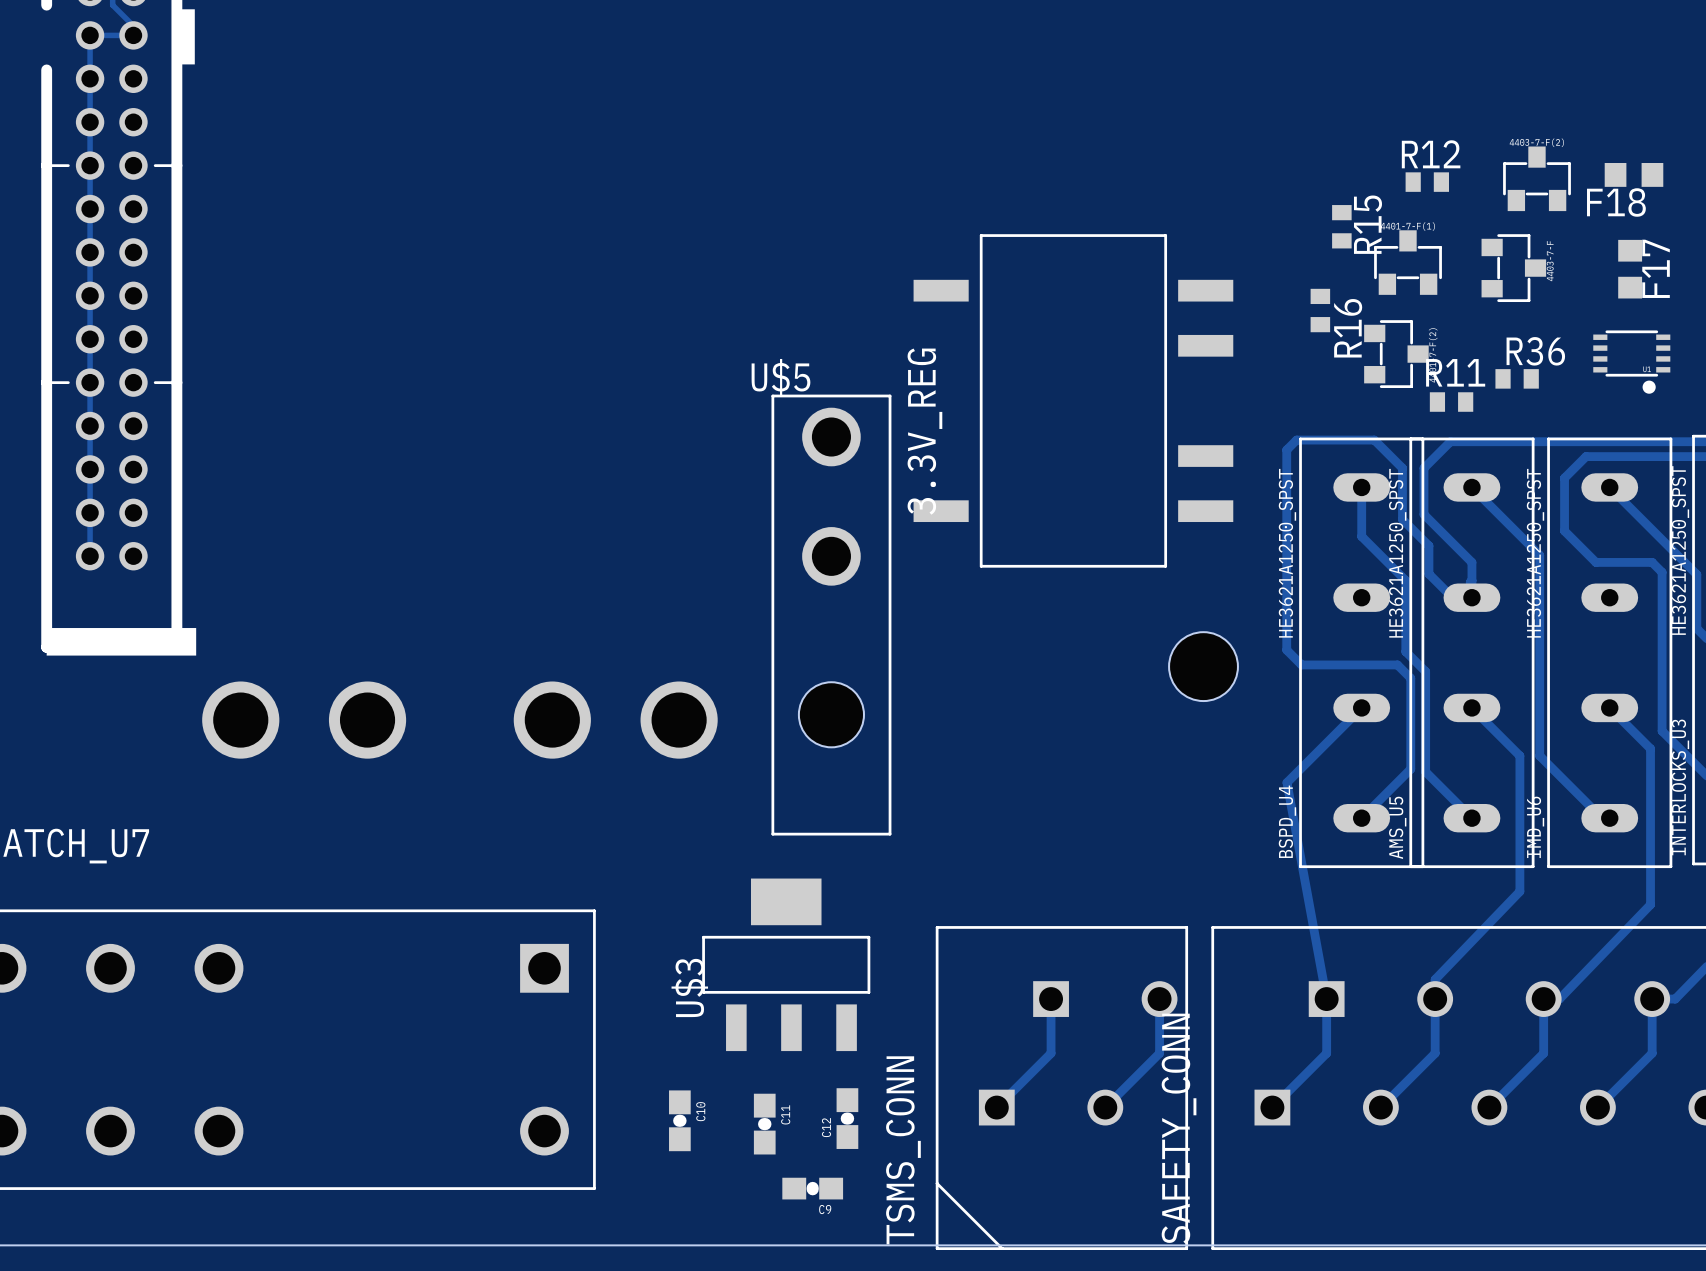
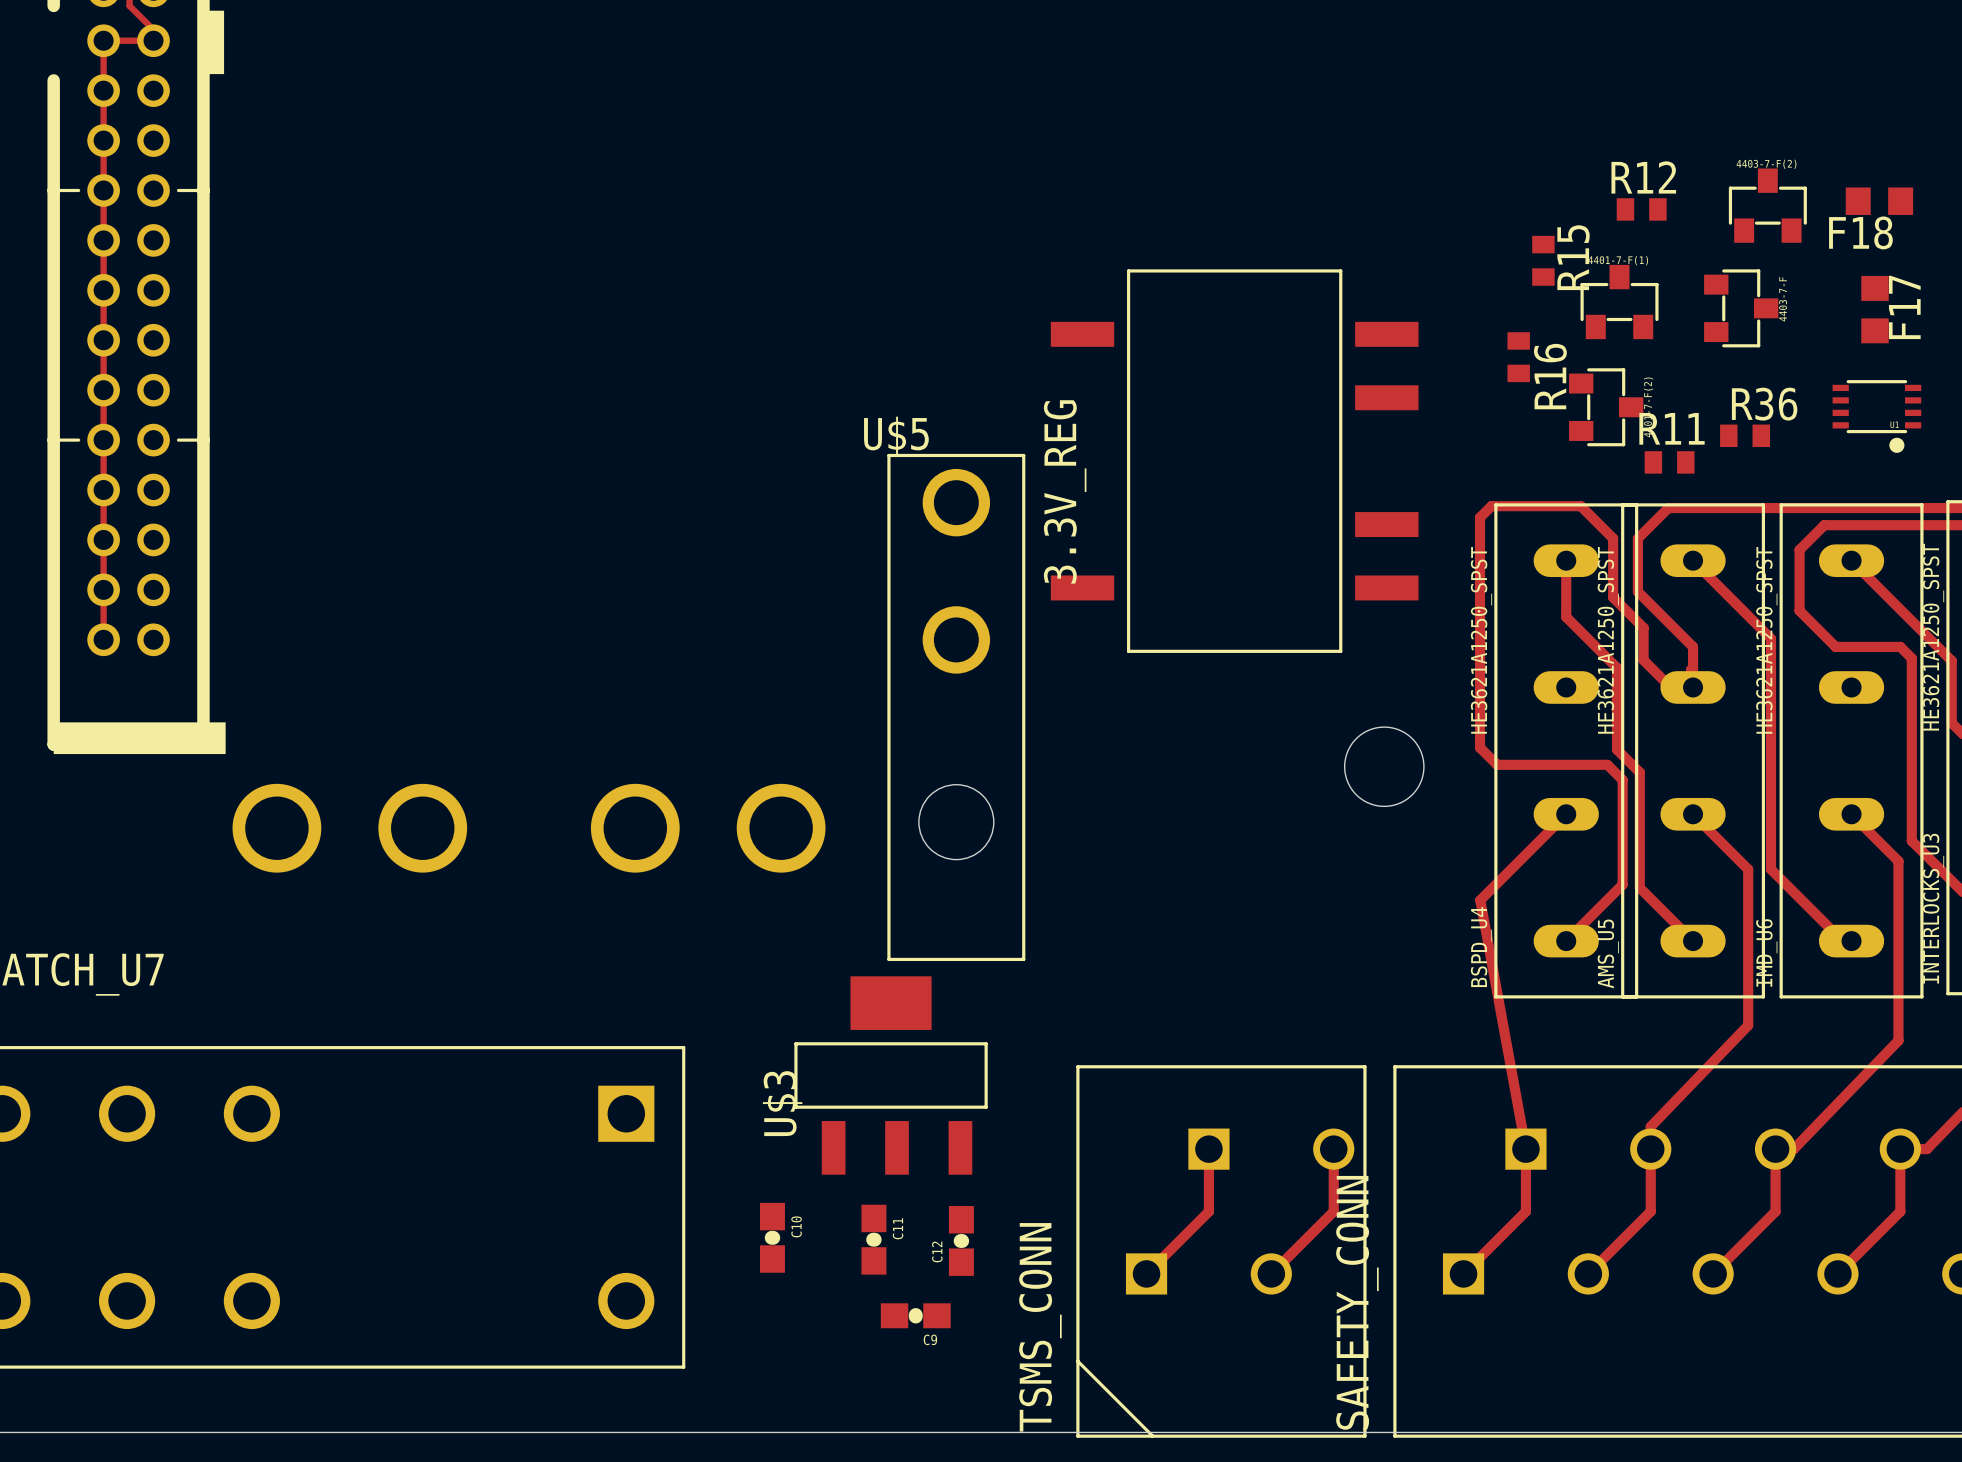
U$3 position: (786, 964) -> (891, 1075)
C12 position: (847, 1118) -> (961, 1240)
C10 position: (679, 1120) -> (772, 1237)
C11 position: (764, 1124) -> (873, 1239)
C9 position: (812, 1188) -> (915, 1315)

